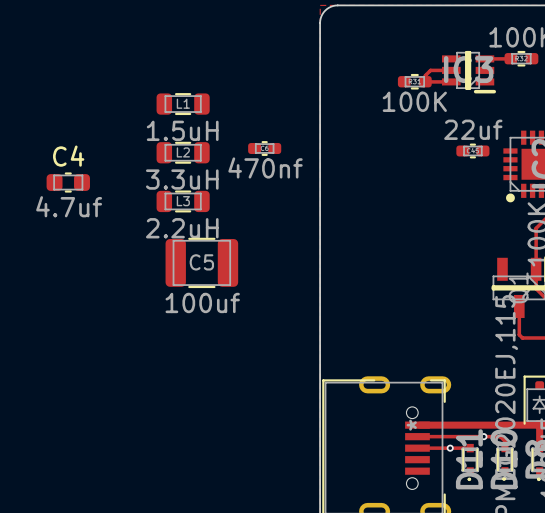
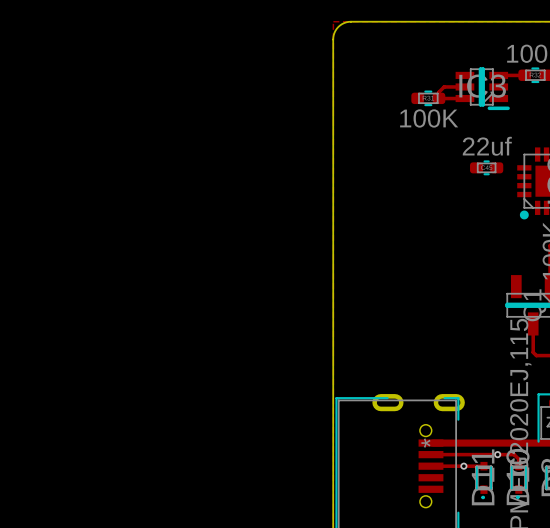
L1: 1.5uH (183, 104) -> none
part: 470nf (264, 148) -> none
L2: 3.3uH (183, 152) -> none
C4: 4.7uf (68, 182) -> none
L3: 2.2uH (183, 201) -> none
C5: 100uf (201, 262) -> none

